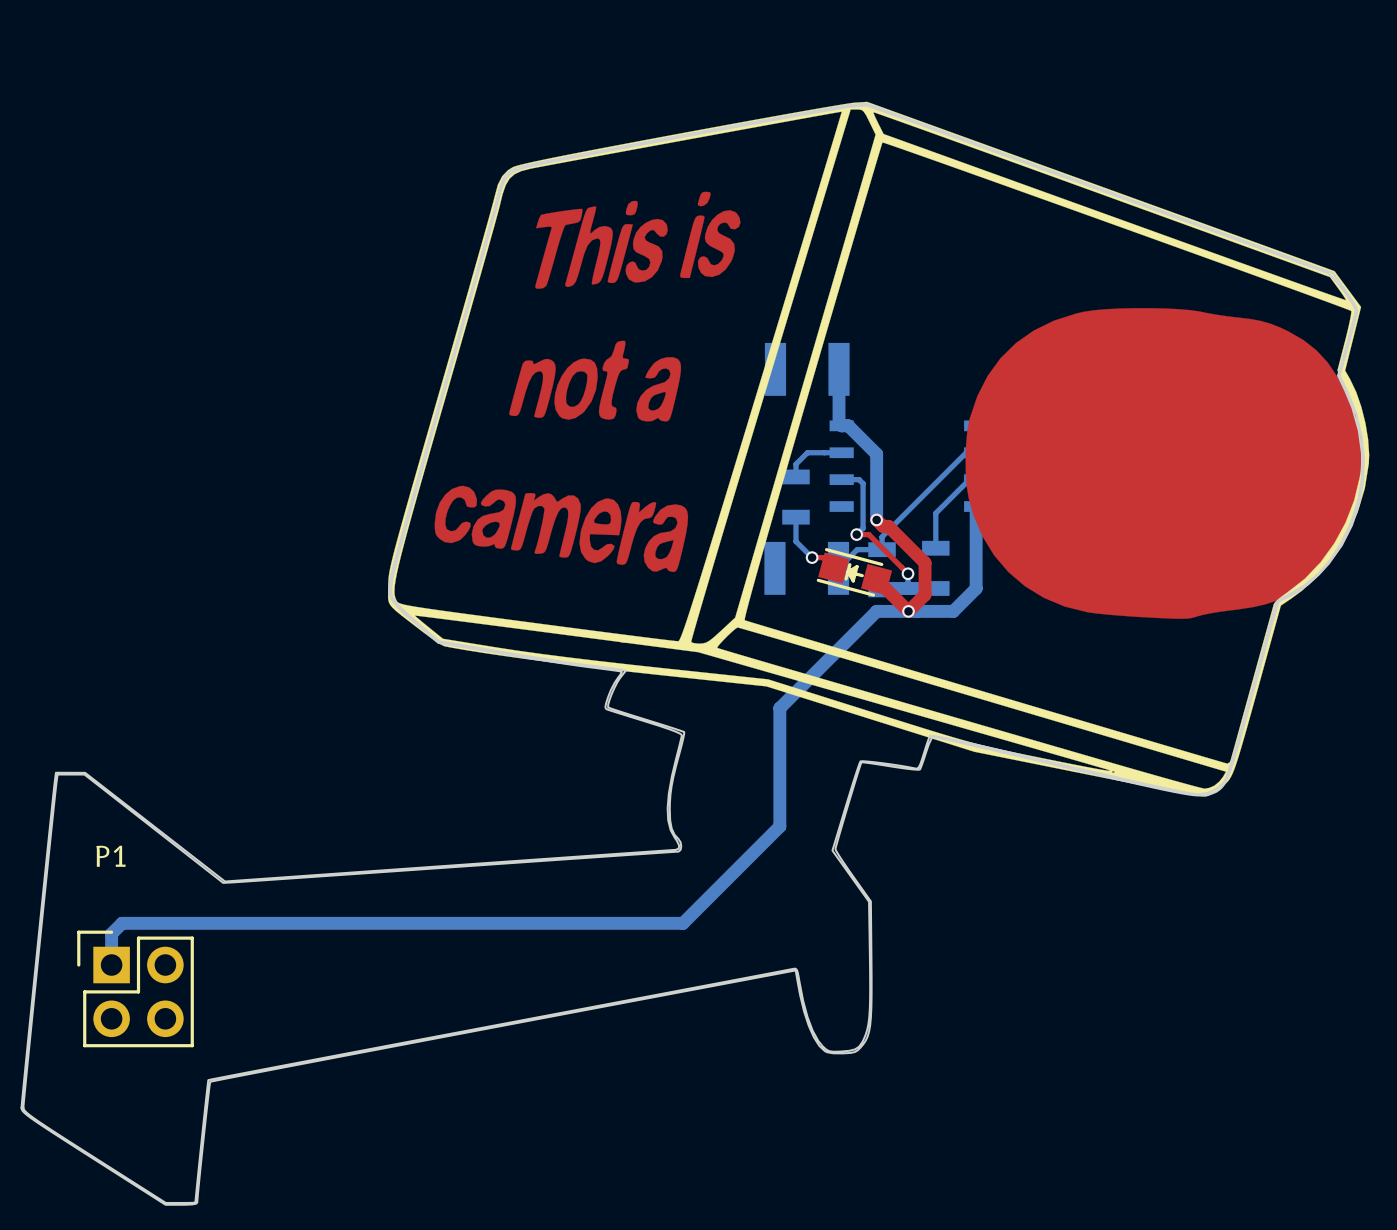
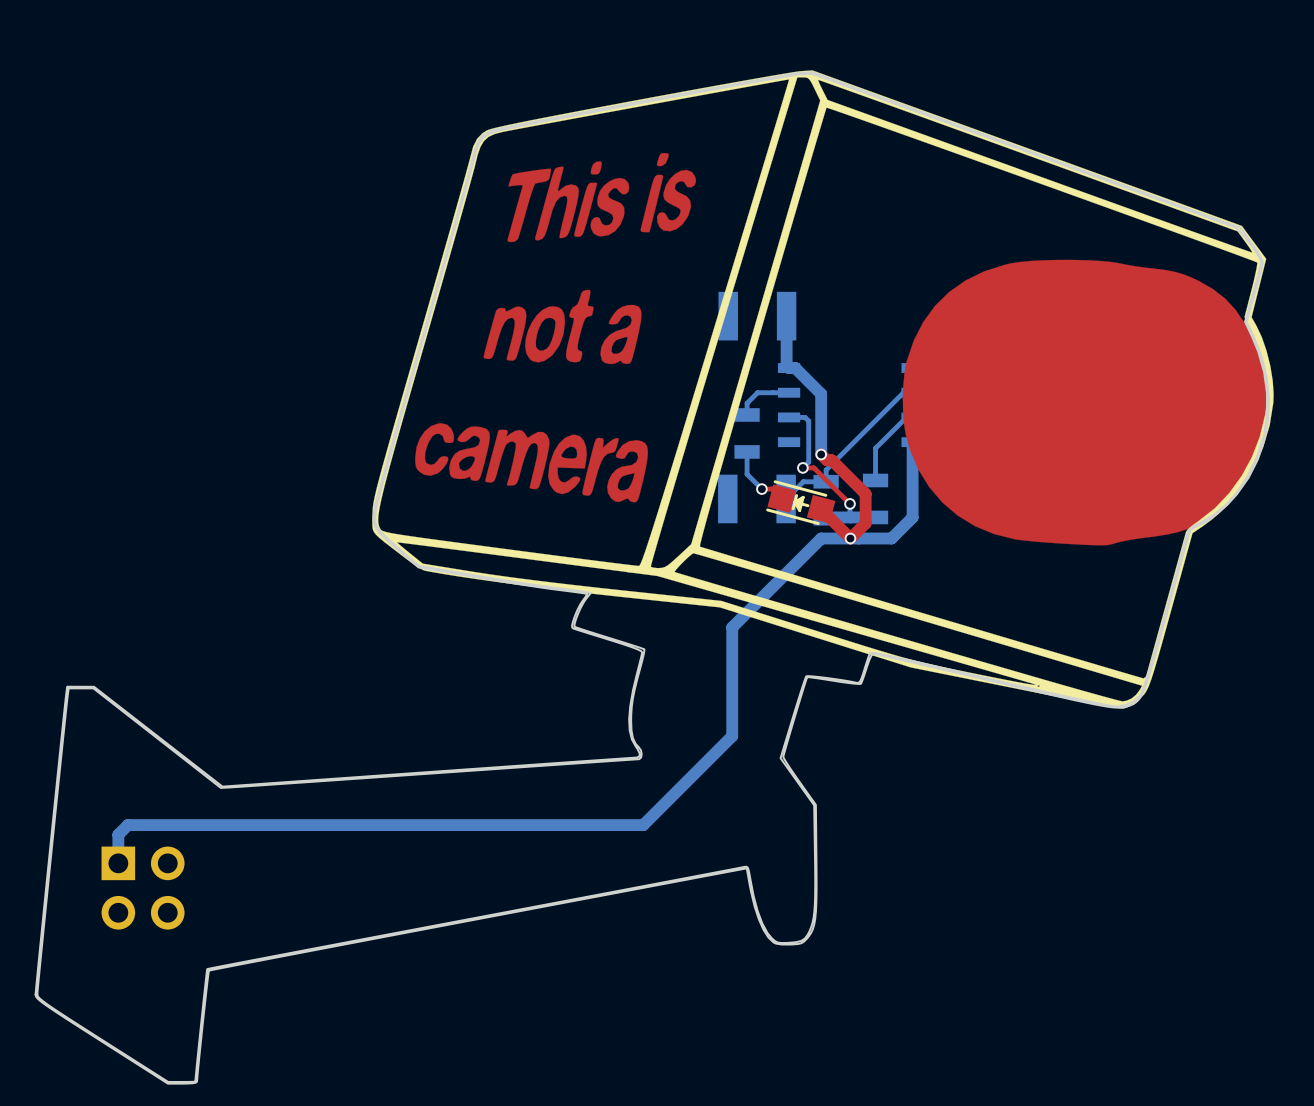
P1: (135, 988) -> none

